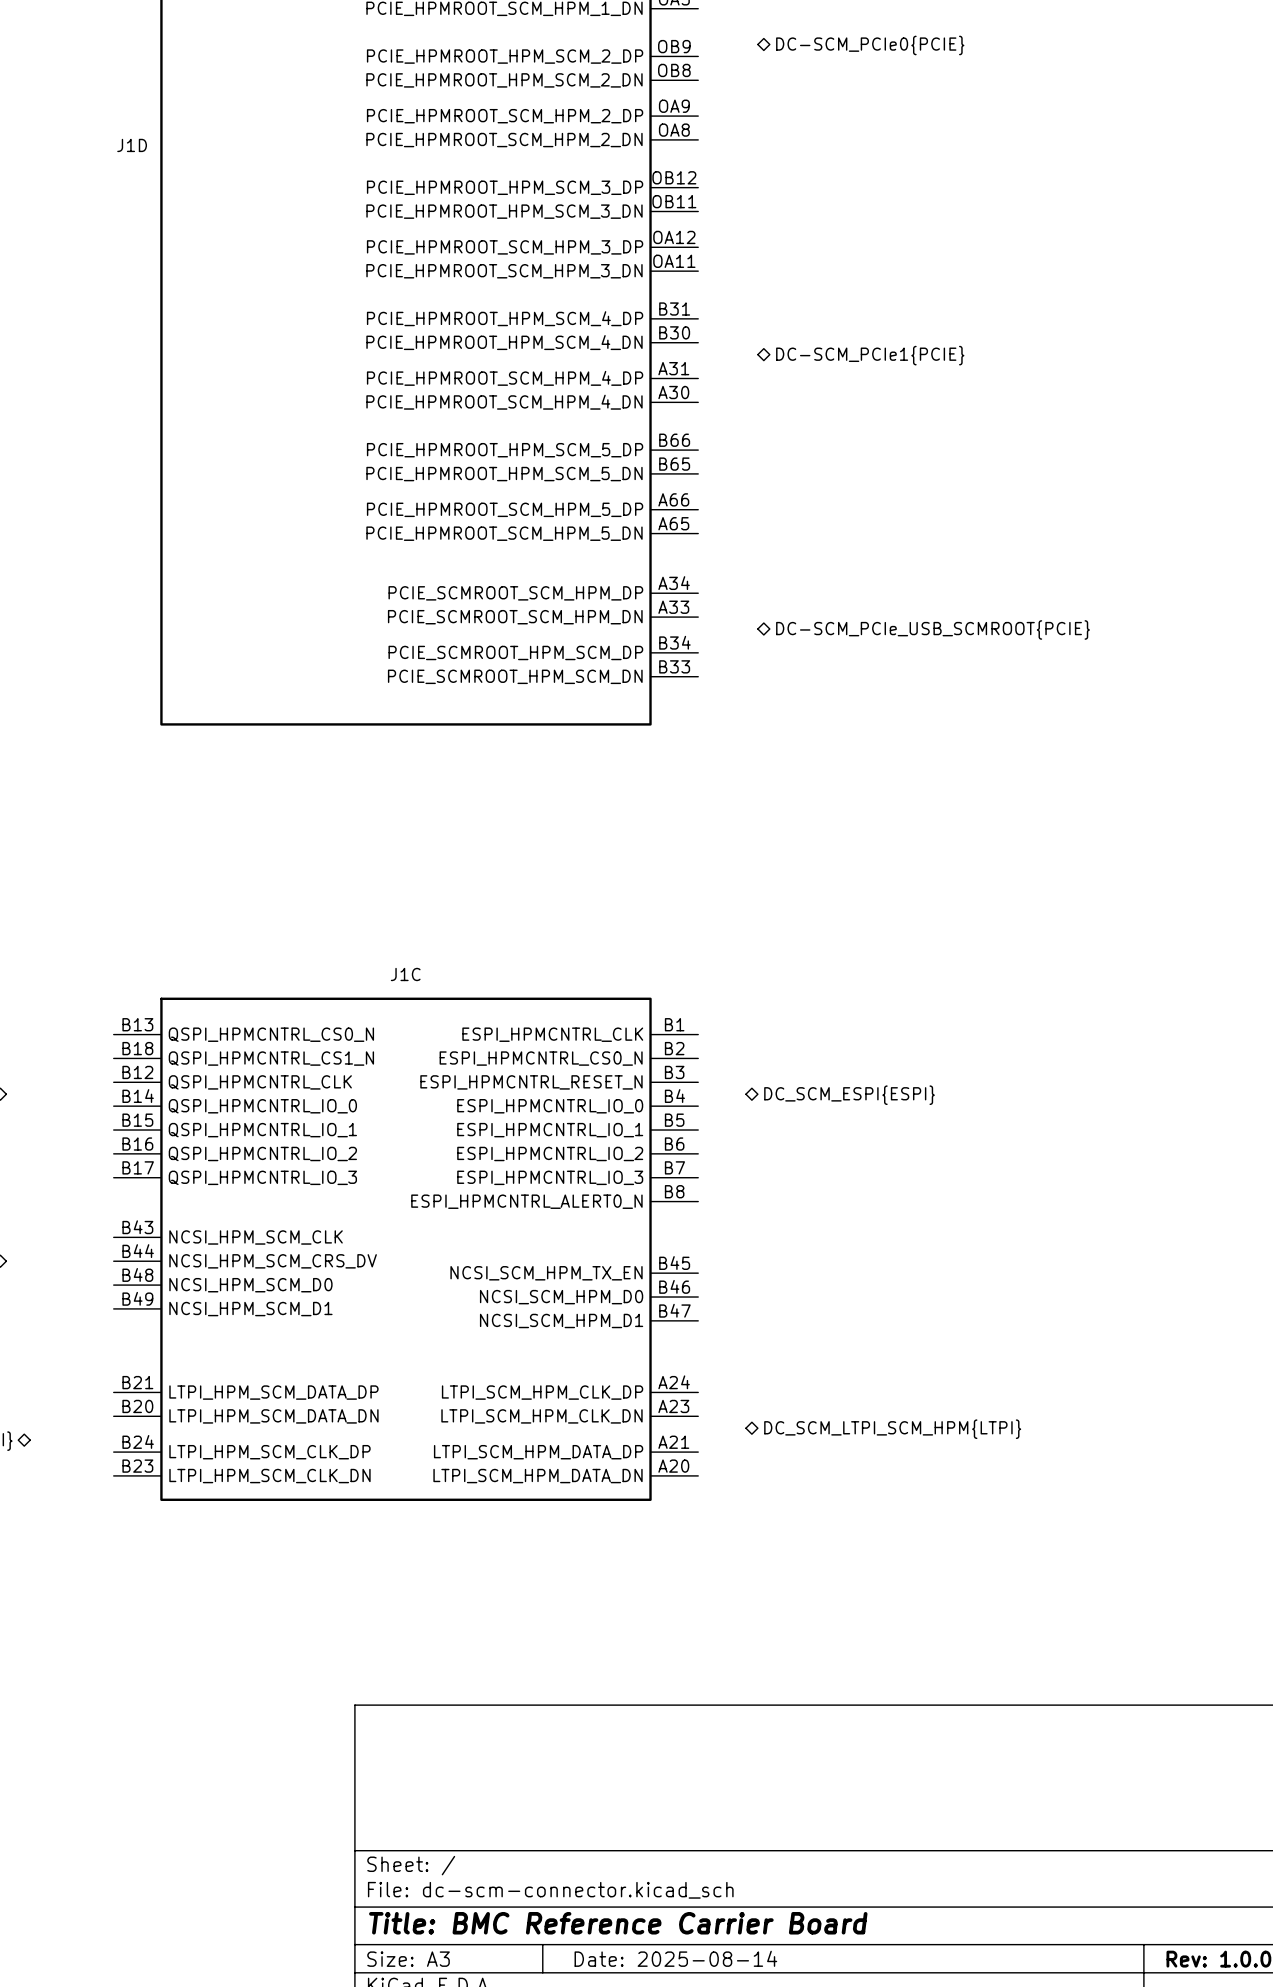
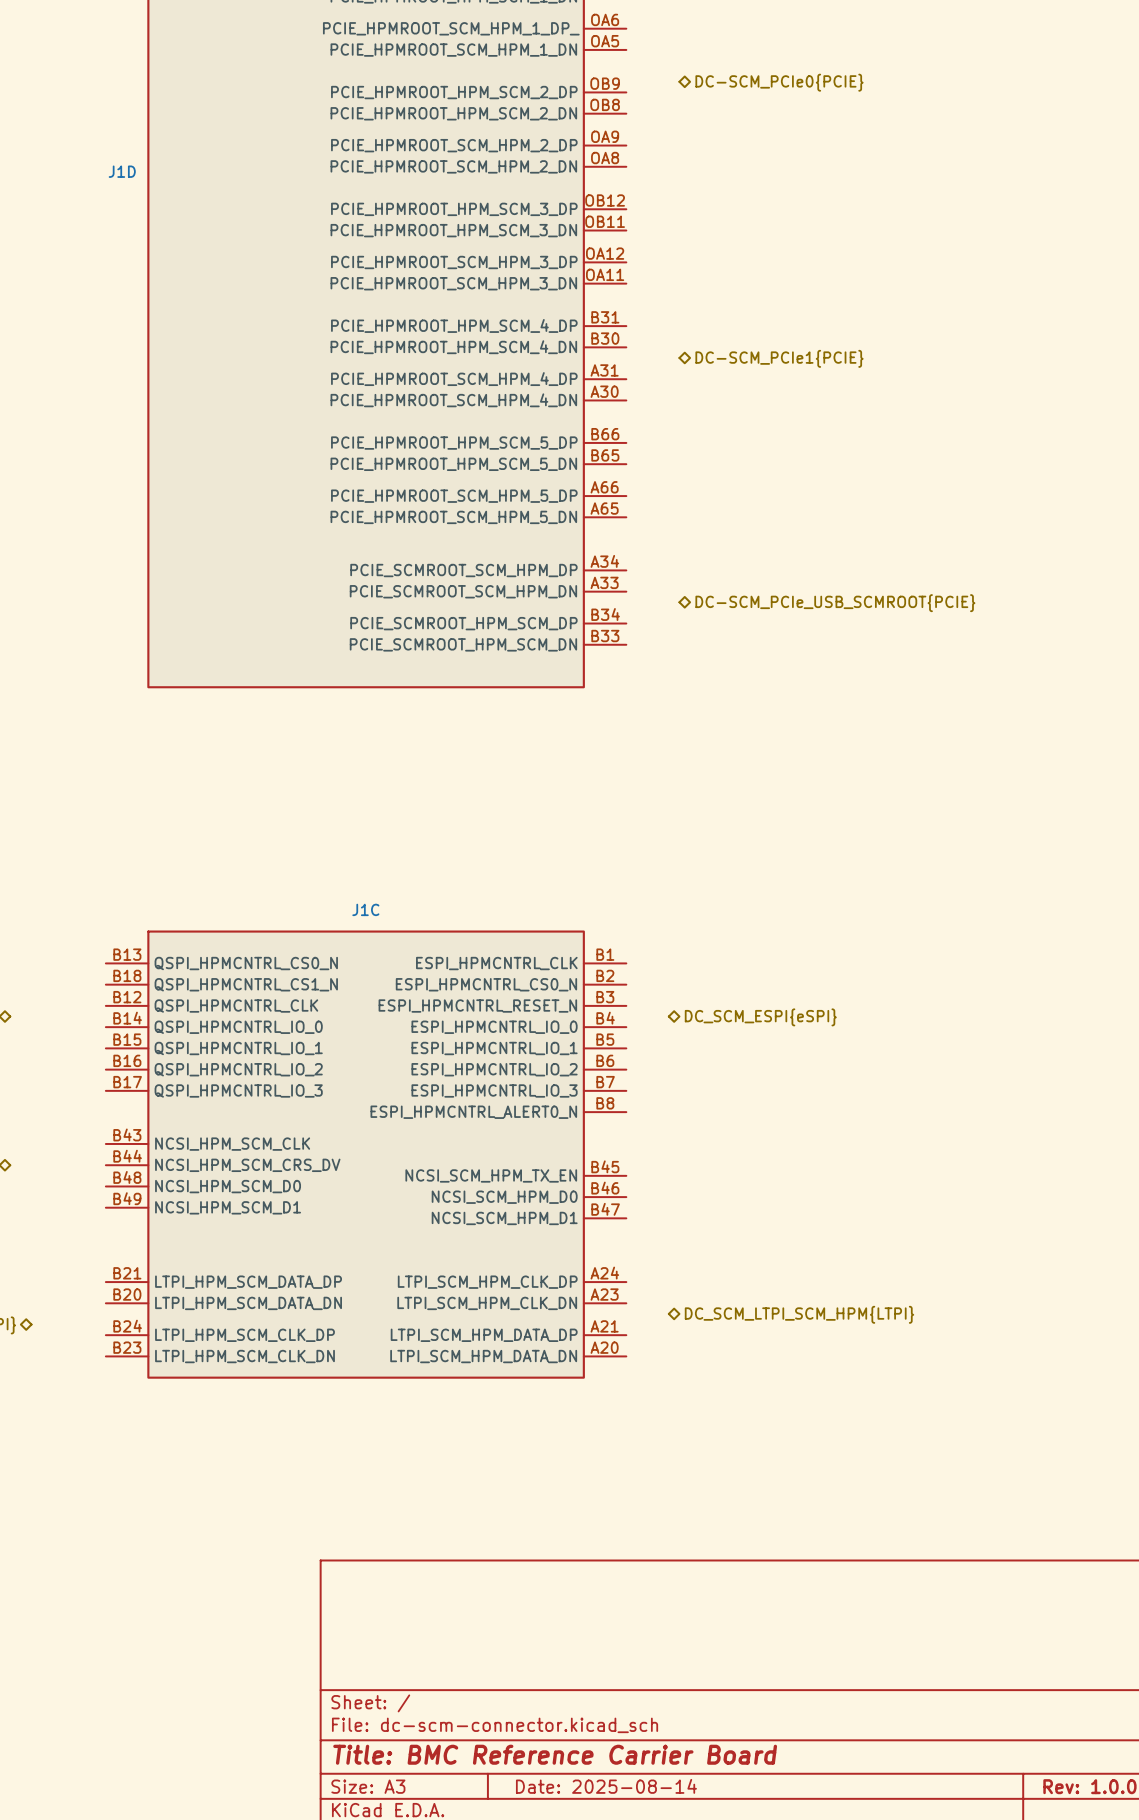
hierarchical label: DC_SCM_ESPI{ESPI} (849, 1095) -> DC_SCM_ESPI{eSPI} (760, 1017)

